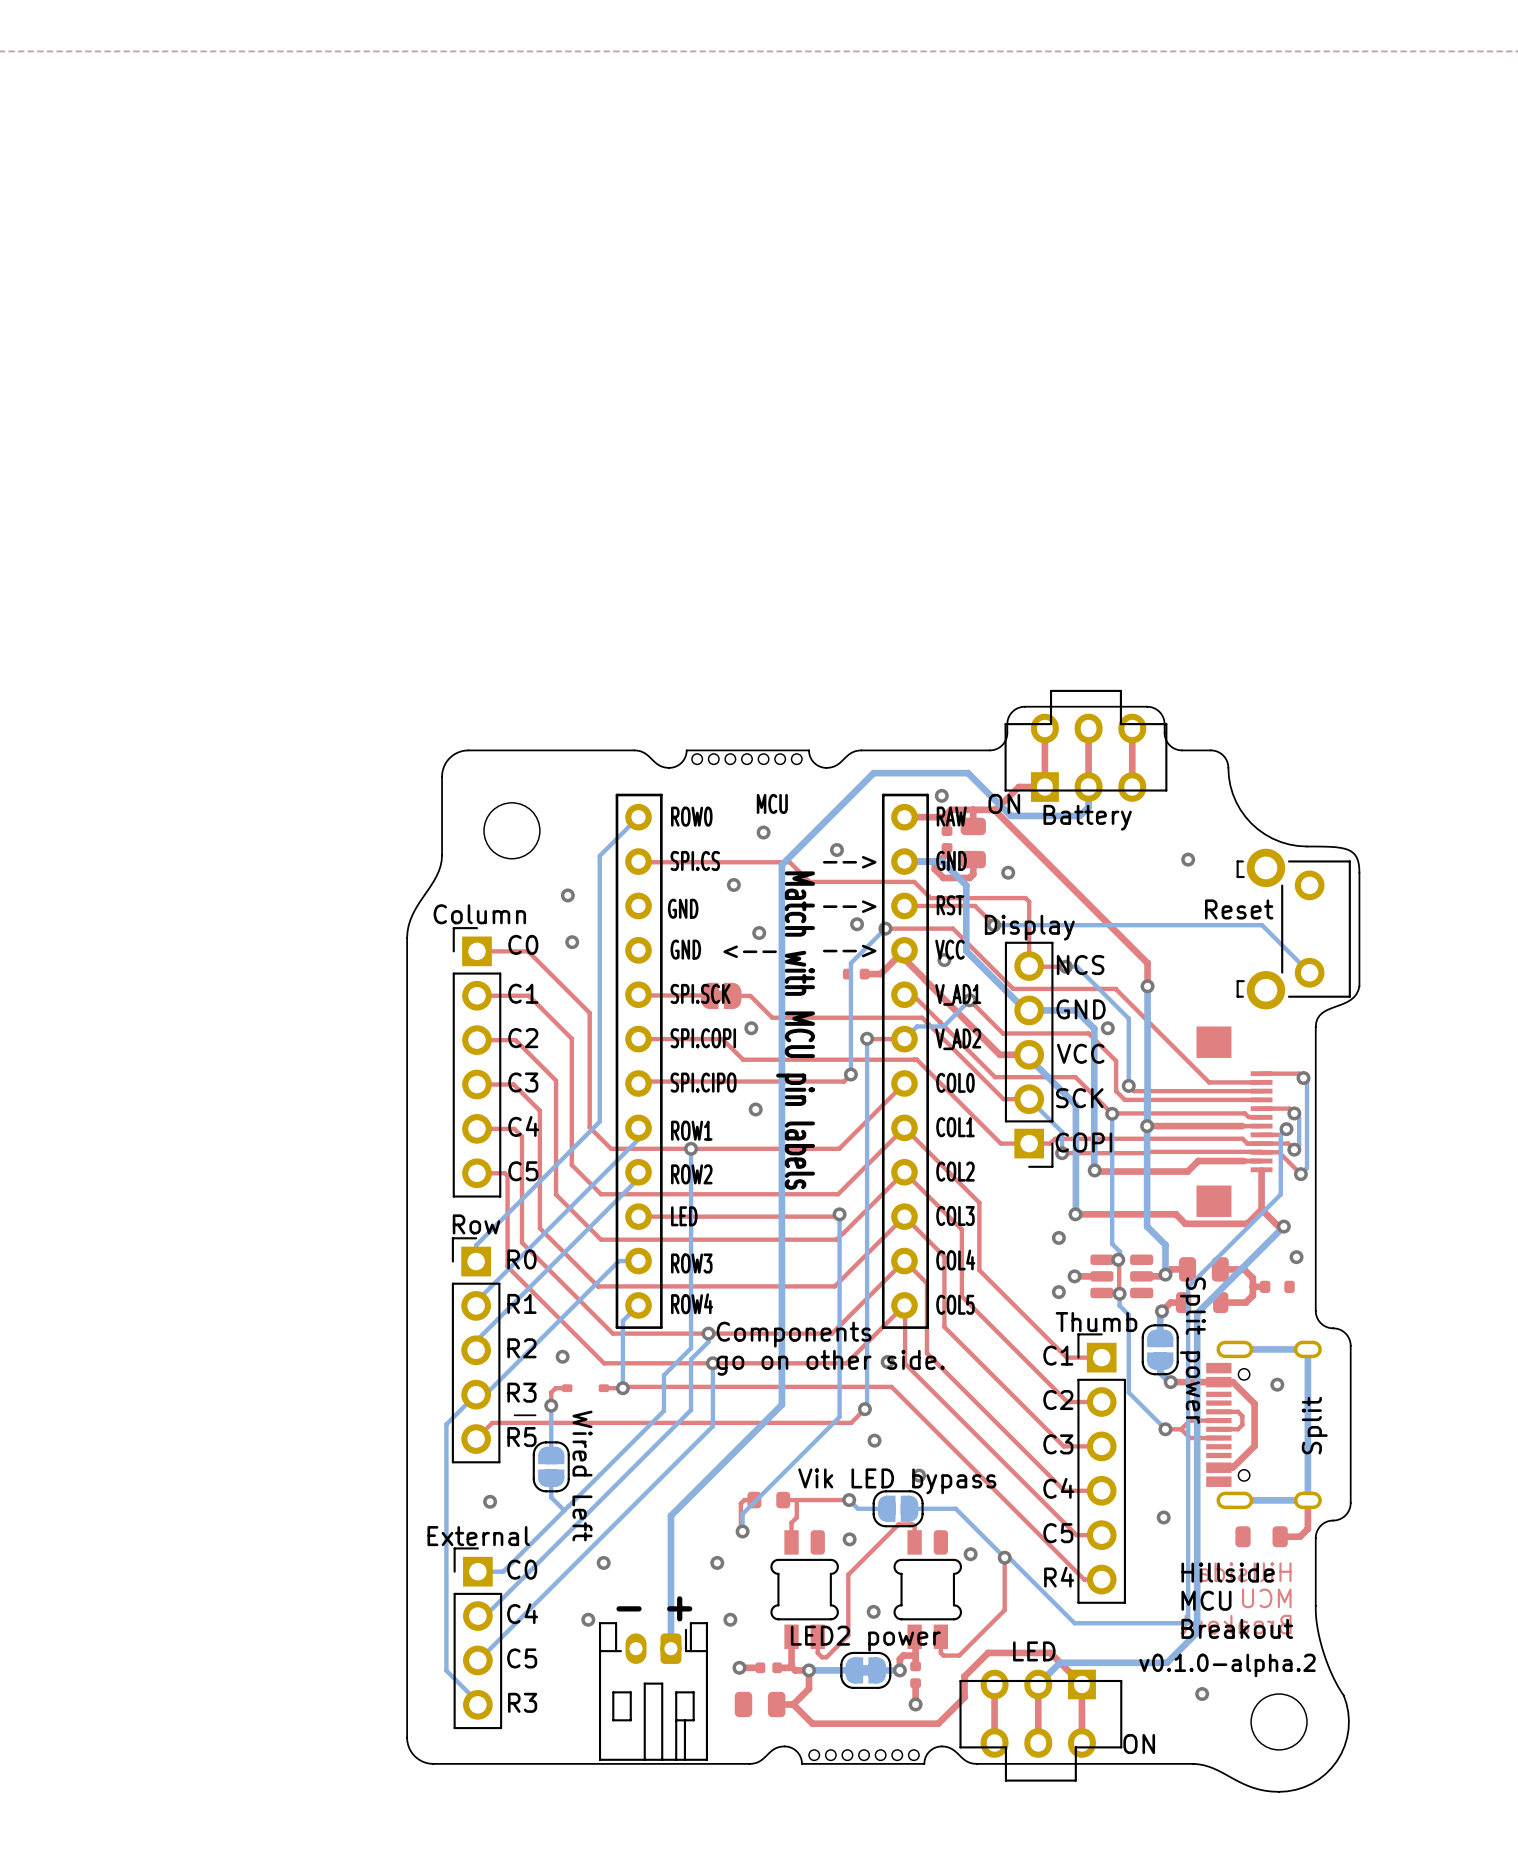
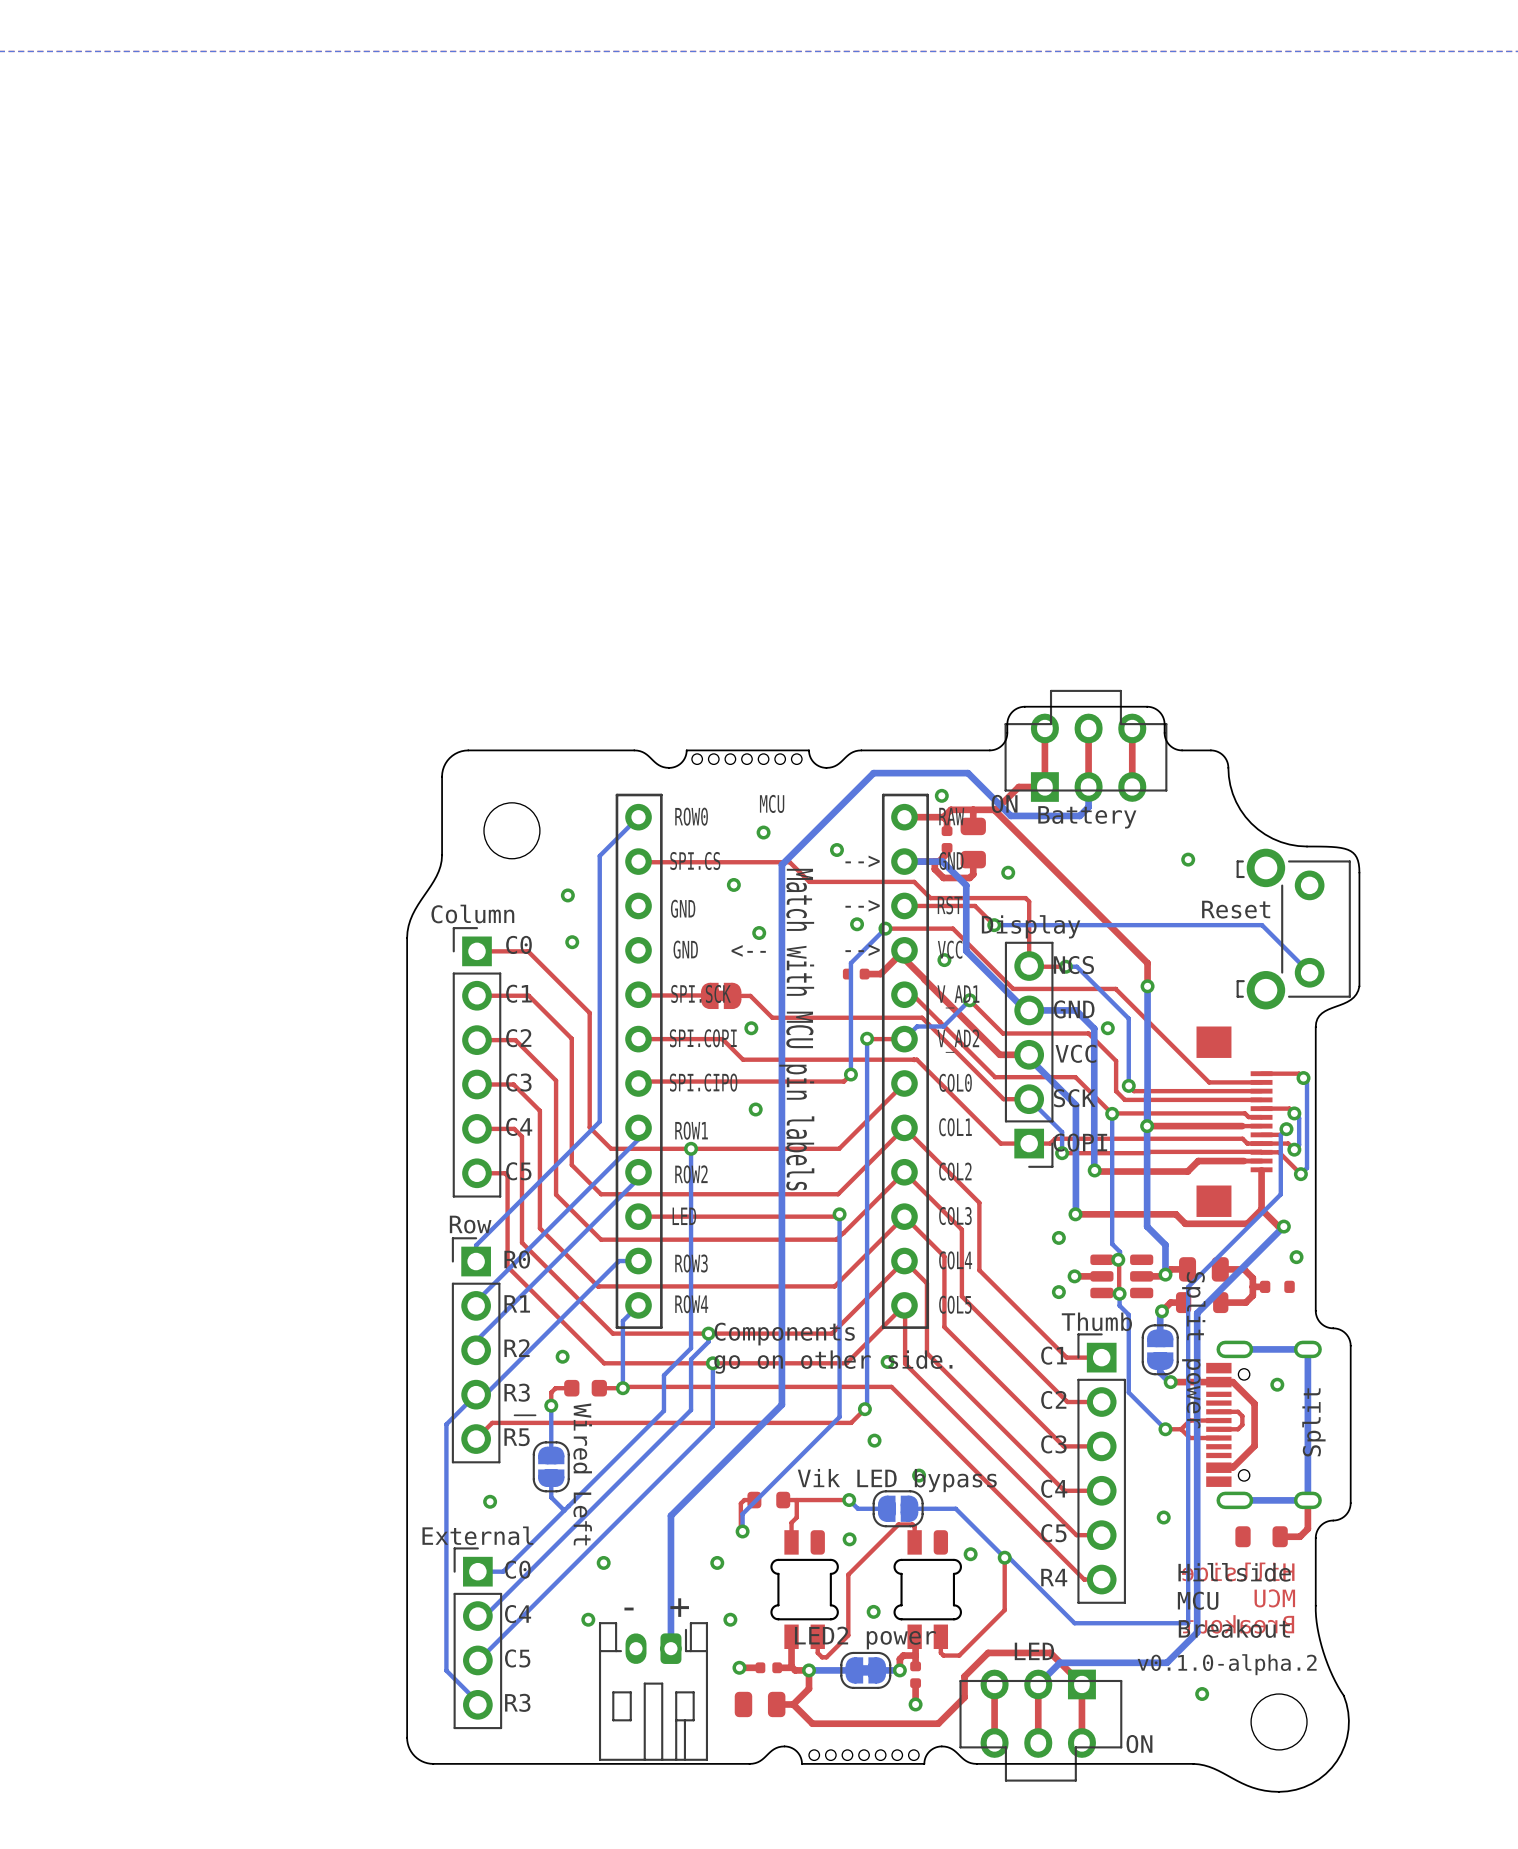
part footprint: [561, 1384, 610, 1393] -> [564, 1379, 607, 1397]

